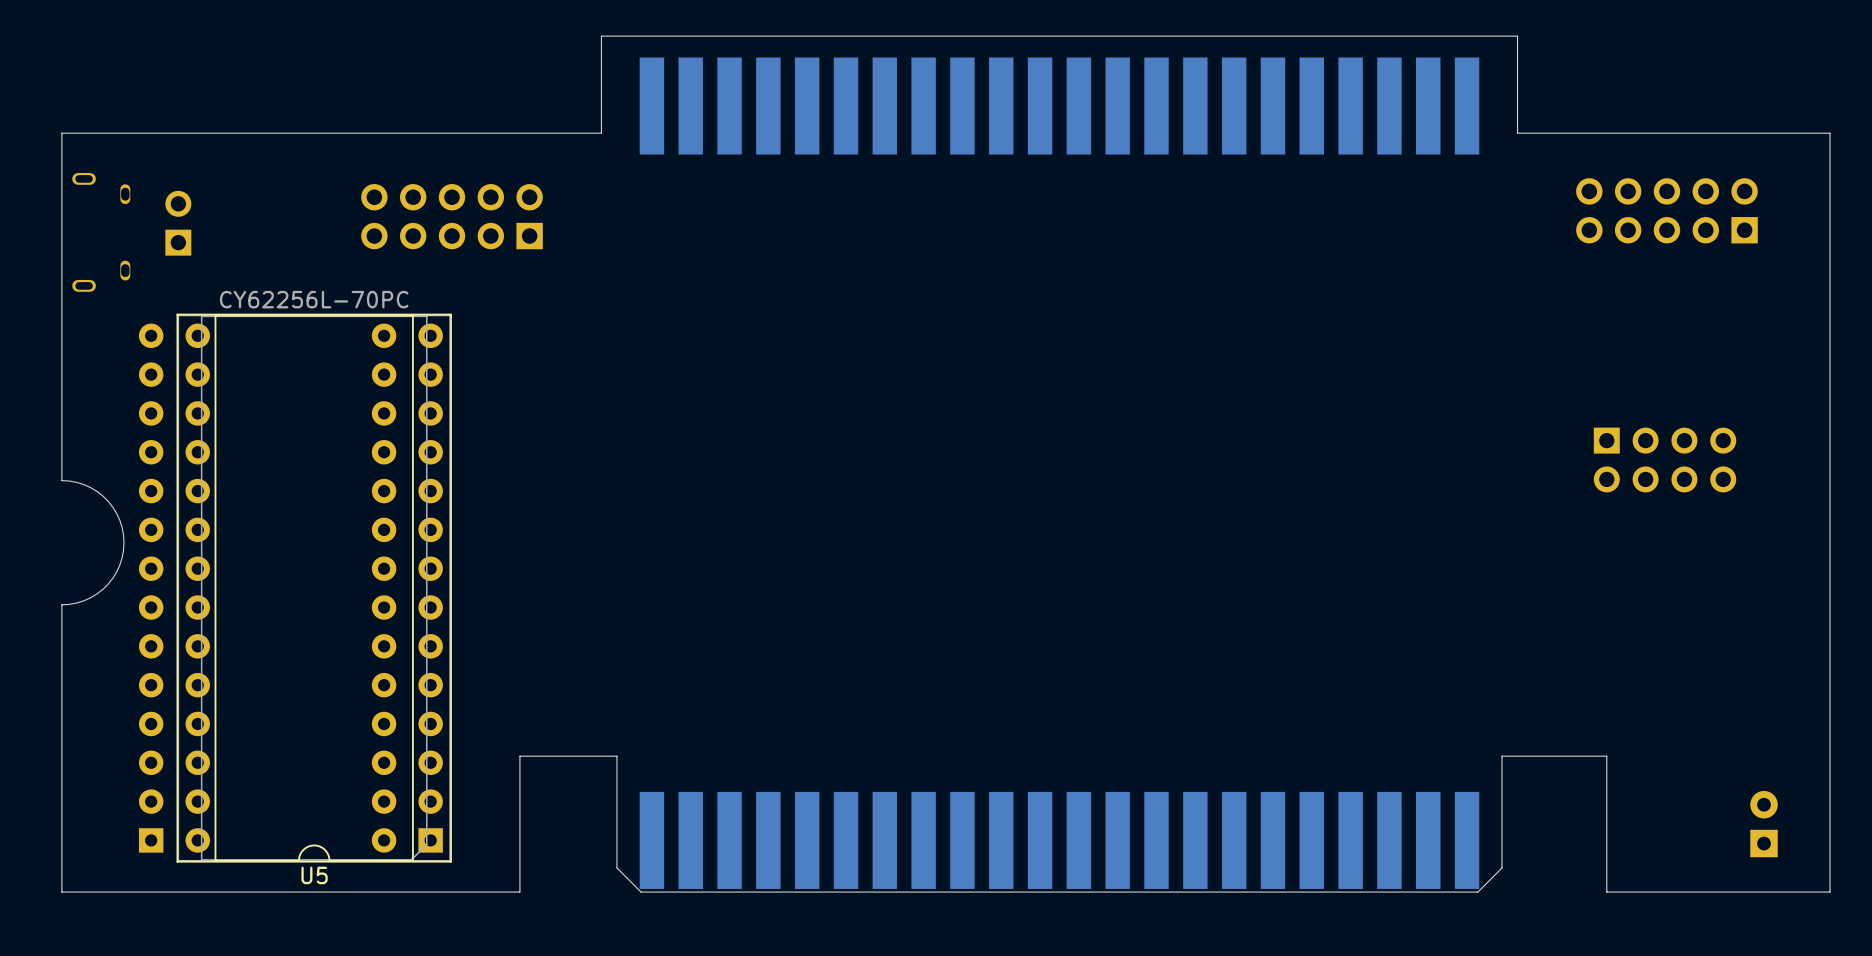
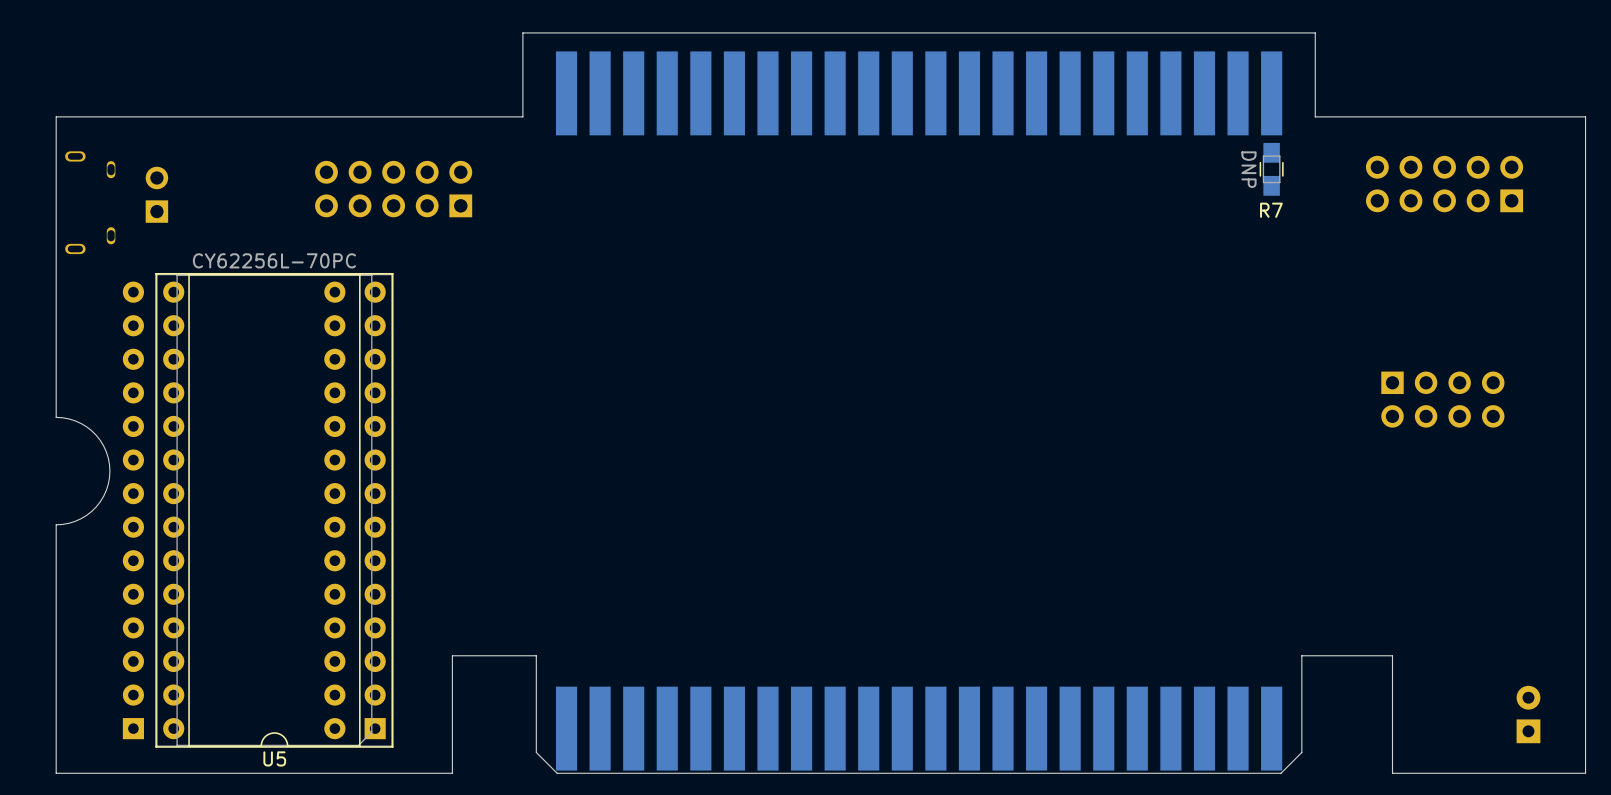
R7: none -> DNP (1271, 169)

